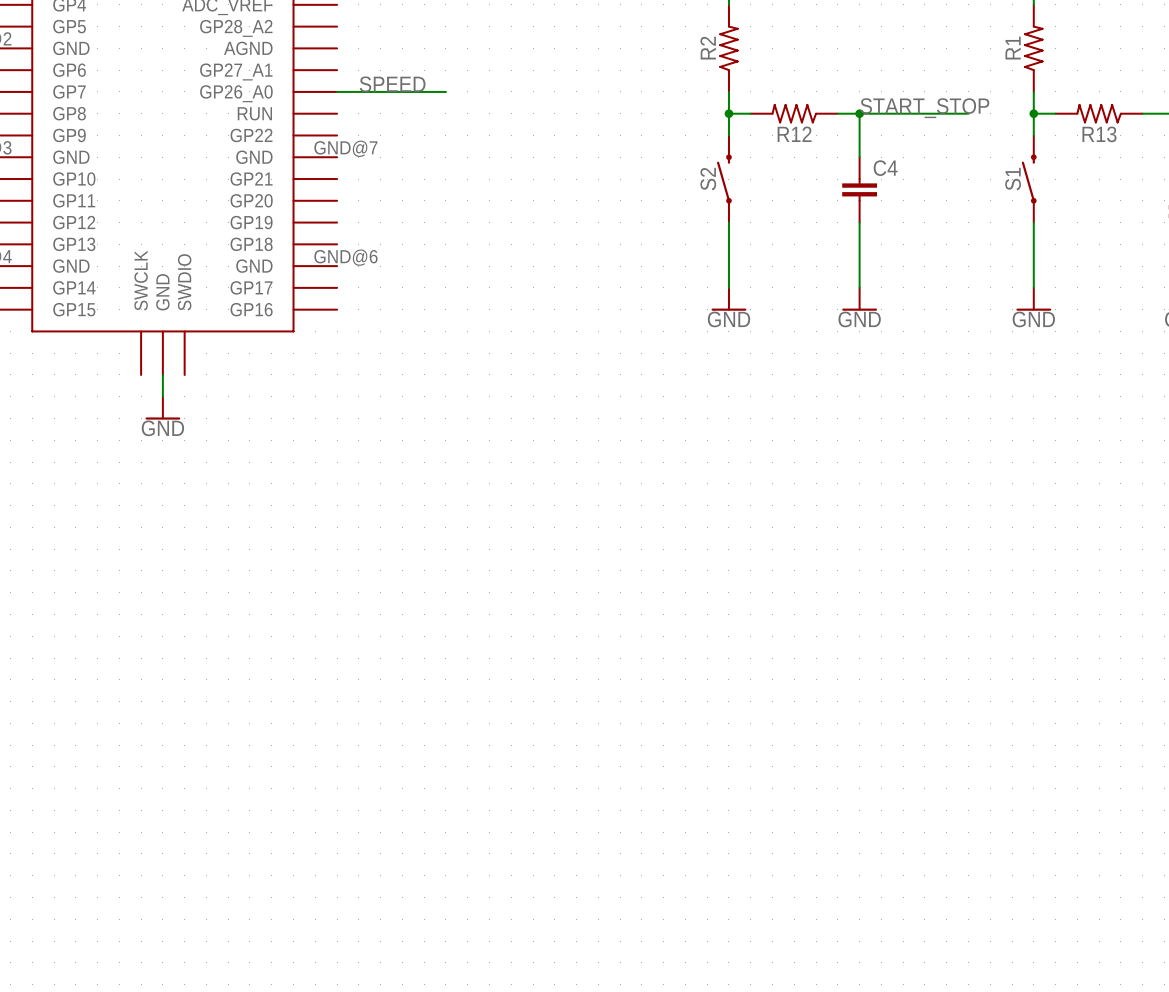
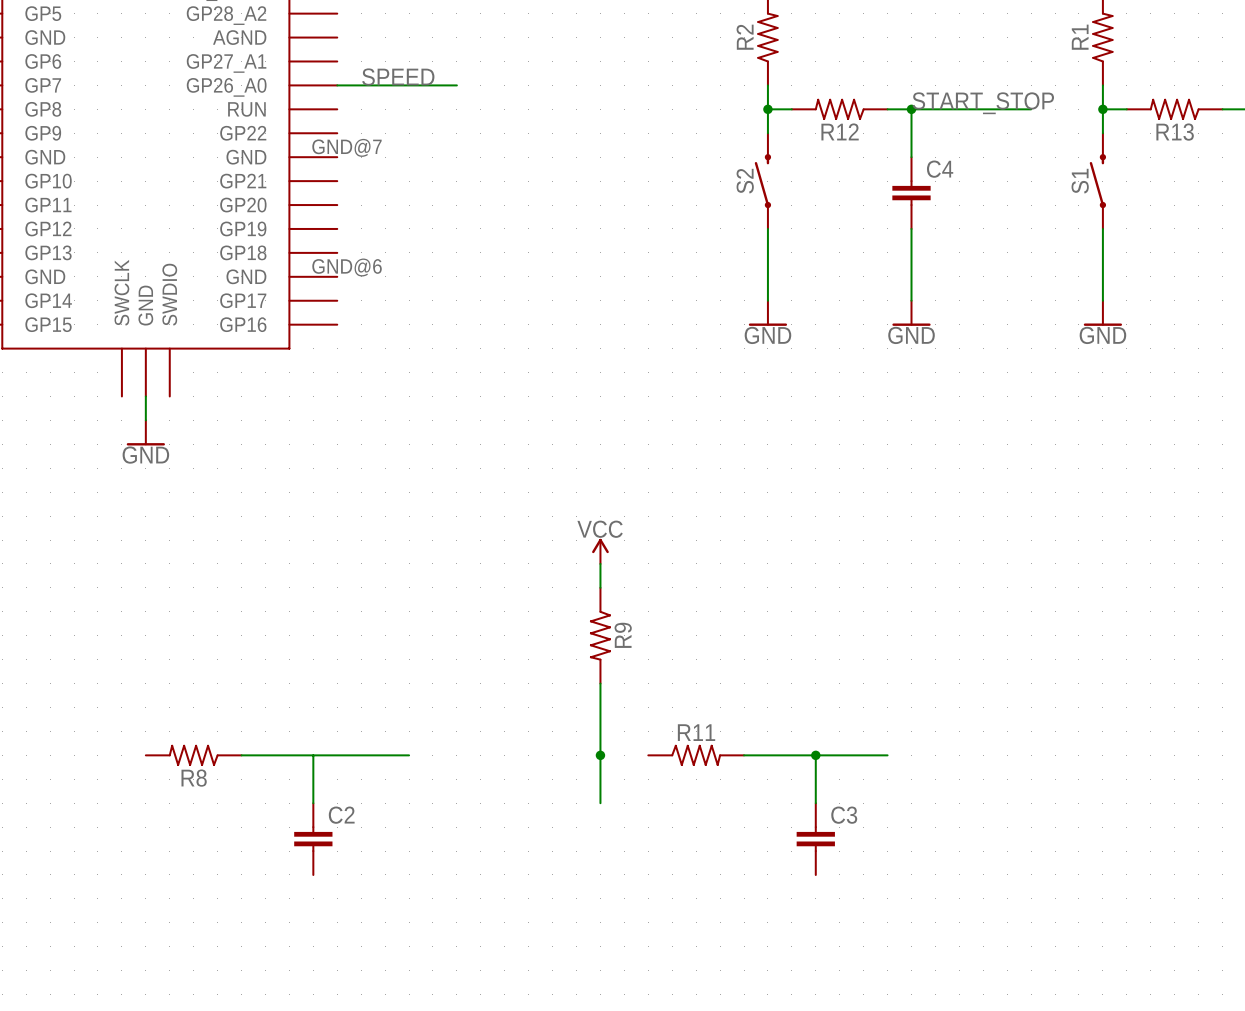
power symbol: none -> VCC (600, 551)
wire: none -> (600, 563) (600, 587)
R9: none -> (600, 635)
wire: none -> (600, 683) (600, 803)
R8: none -> (193, 755)
wire: none -> (241, 755) (409, 755)
wire: none -> (313, 755) (313, 803)
junction: none -> (600, 755)
R11: none -> (696, 755)
wire: none -> (744, 755) (887, 755)
wire: none -> (815, 755) (815, 803)
junction: none -> (815, 755)
C2: none -> (313, 839)
C3: none -> (815, 839)

